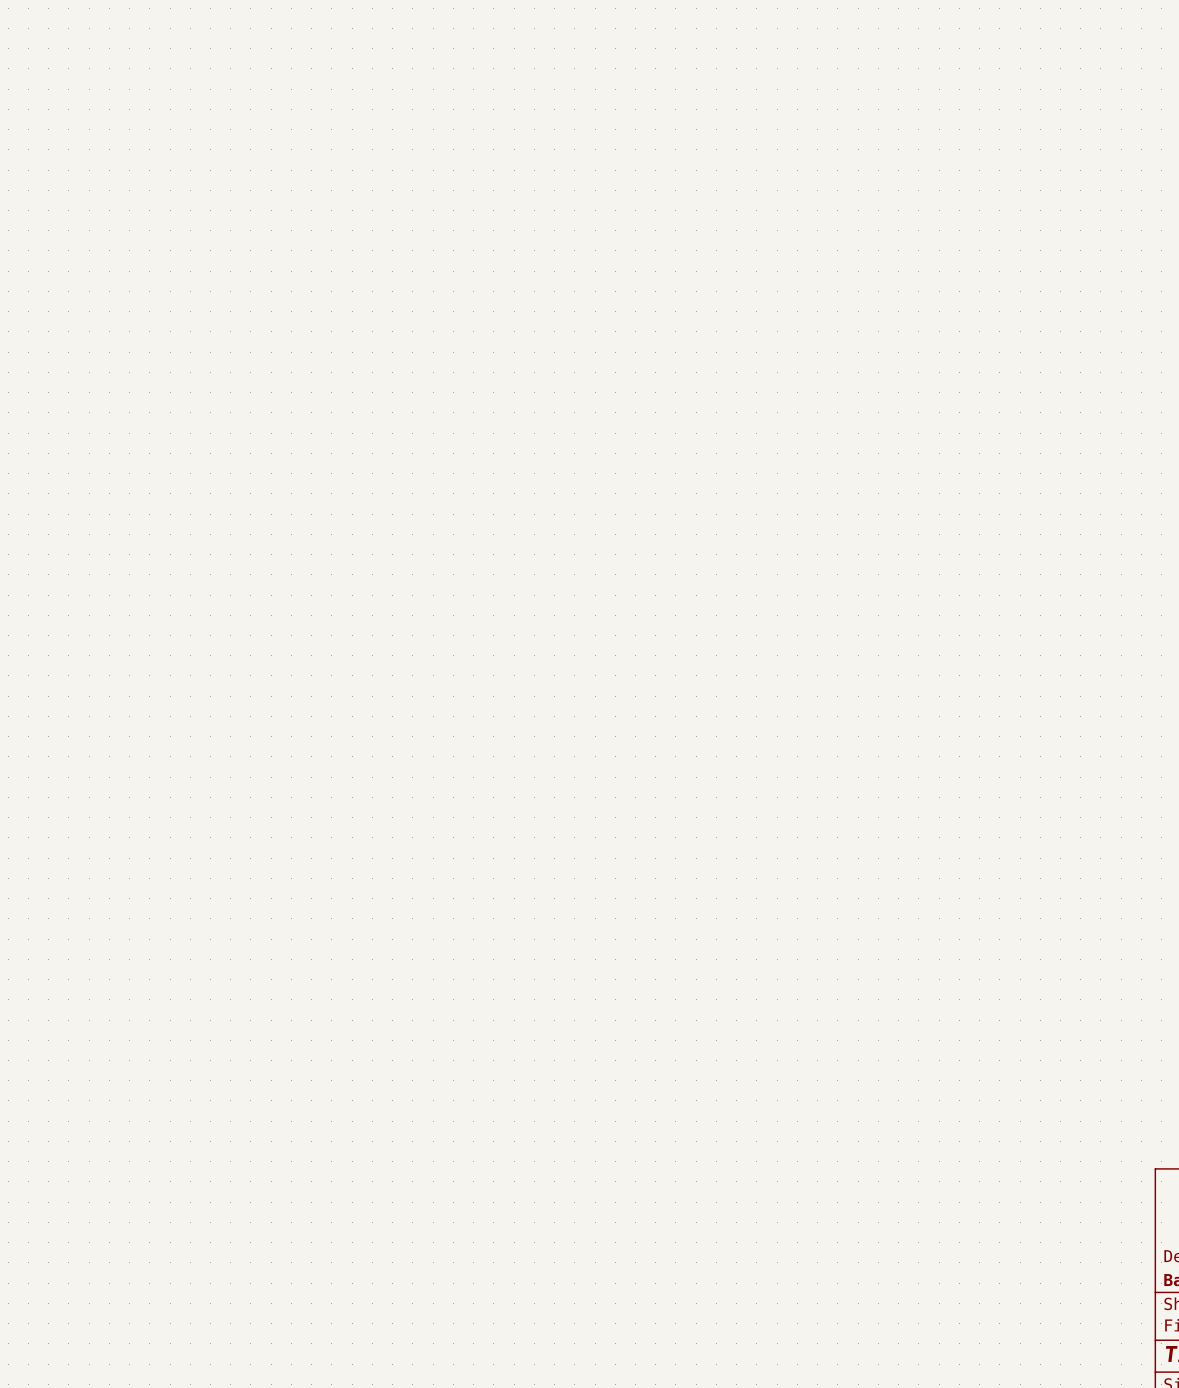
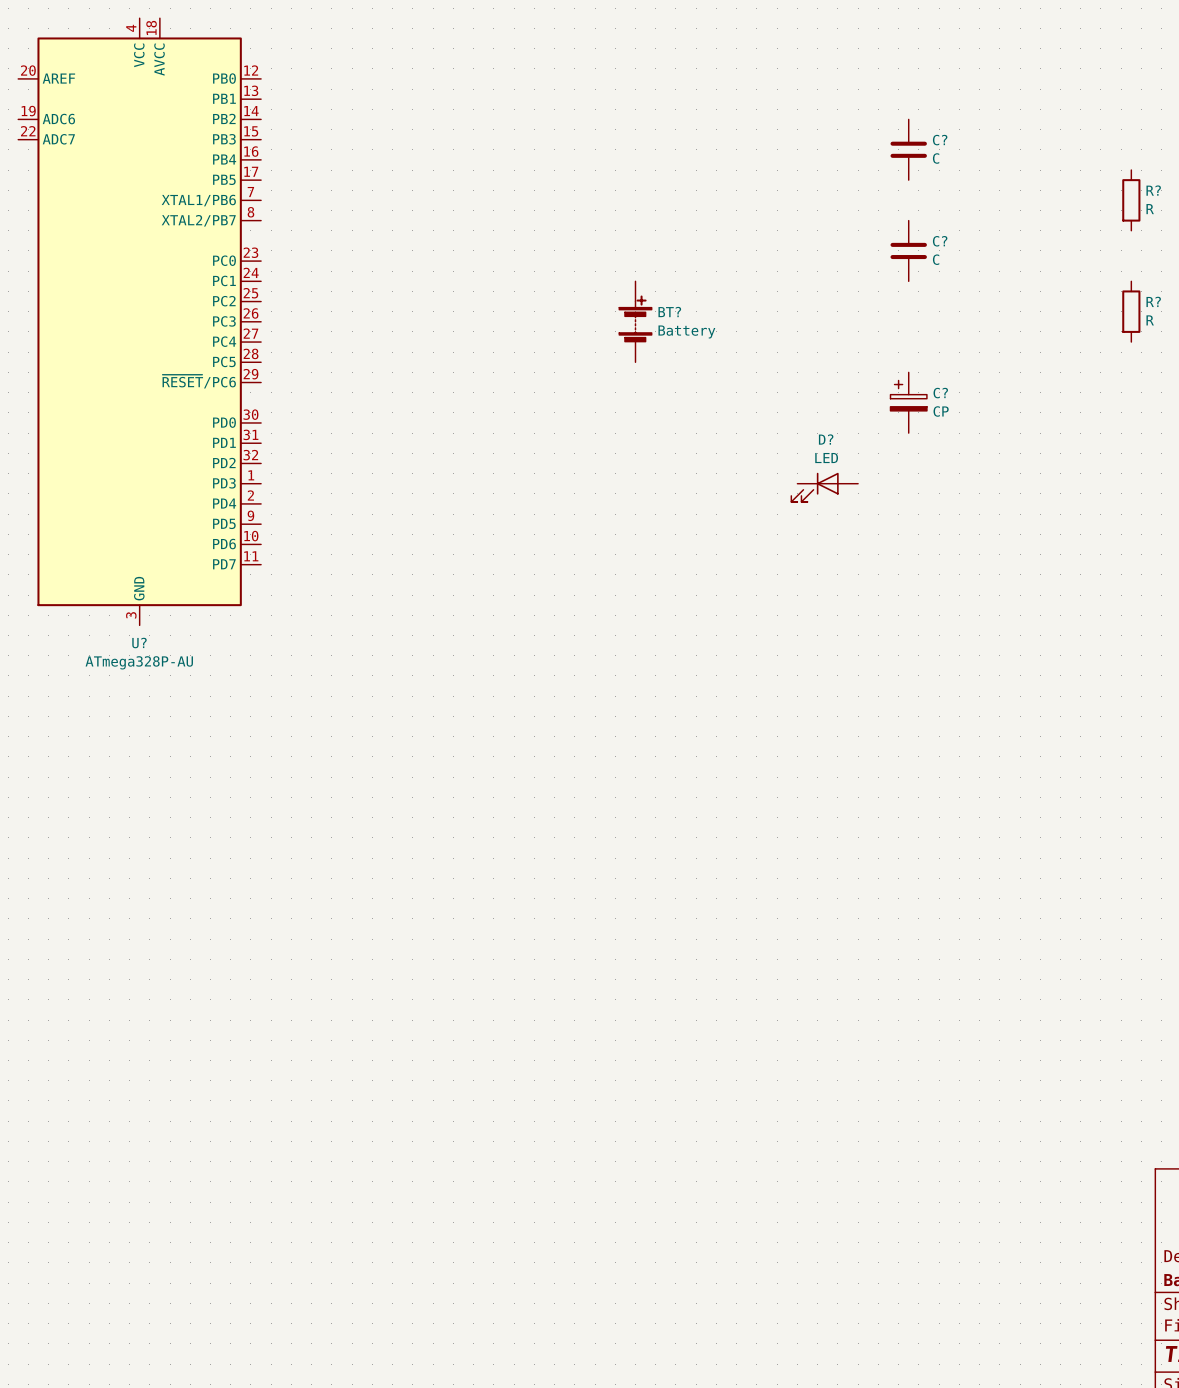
C?: none -> C (908, 149)
R?: none -> R (1131, 200)
C?: none -> C (908, 250)
R?: none -> R (1131, 311)
U?: none -> ATmega328P-AU (139, 321)
BT?: none -> Battery (635, 321)
C?: none -> CP (908, 402)
D?: none -> LED (824, 487)

